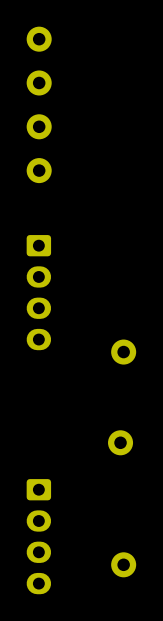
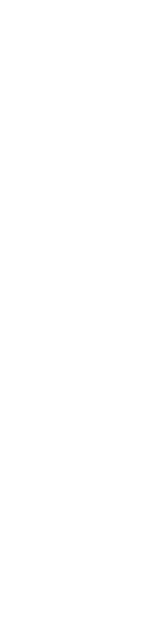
part: (39, 39) -> none
part: (39, 82) -> none
part: (39, 126) -> none
part: (39, 170) -> none
part: (38, 292) -> none
part: (123, 352) -> none
part: (120, 442) -> none
part: (38, 536) -> none
part: (123, 564) -> none

